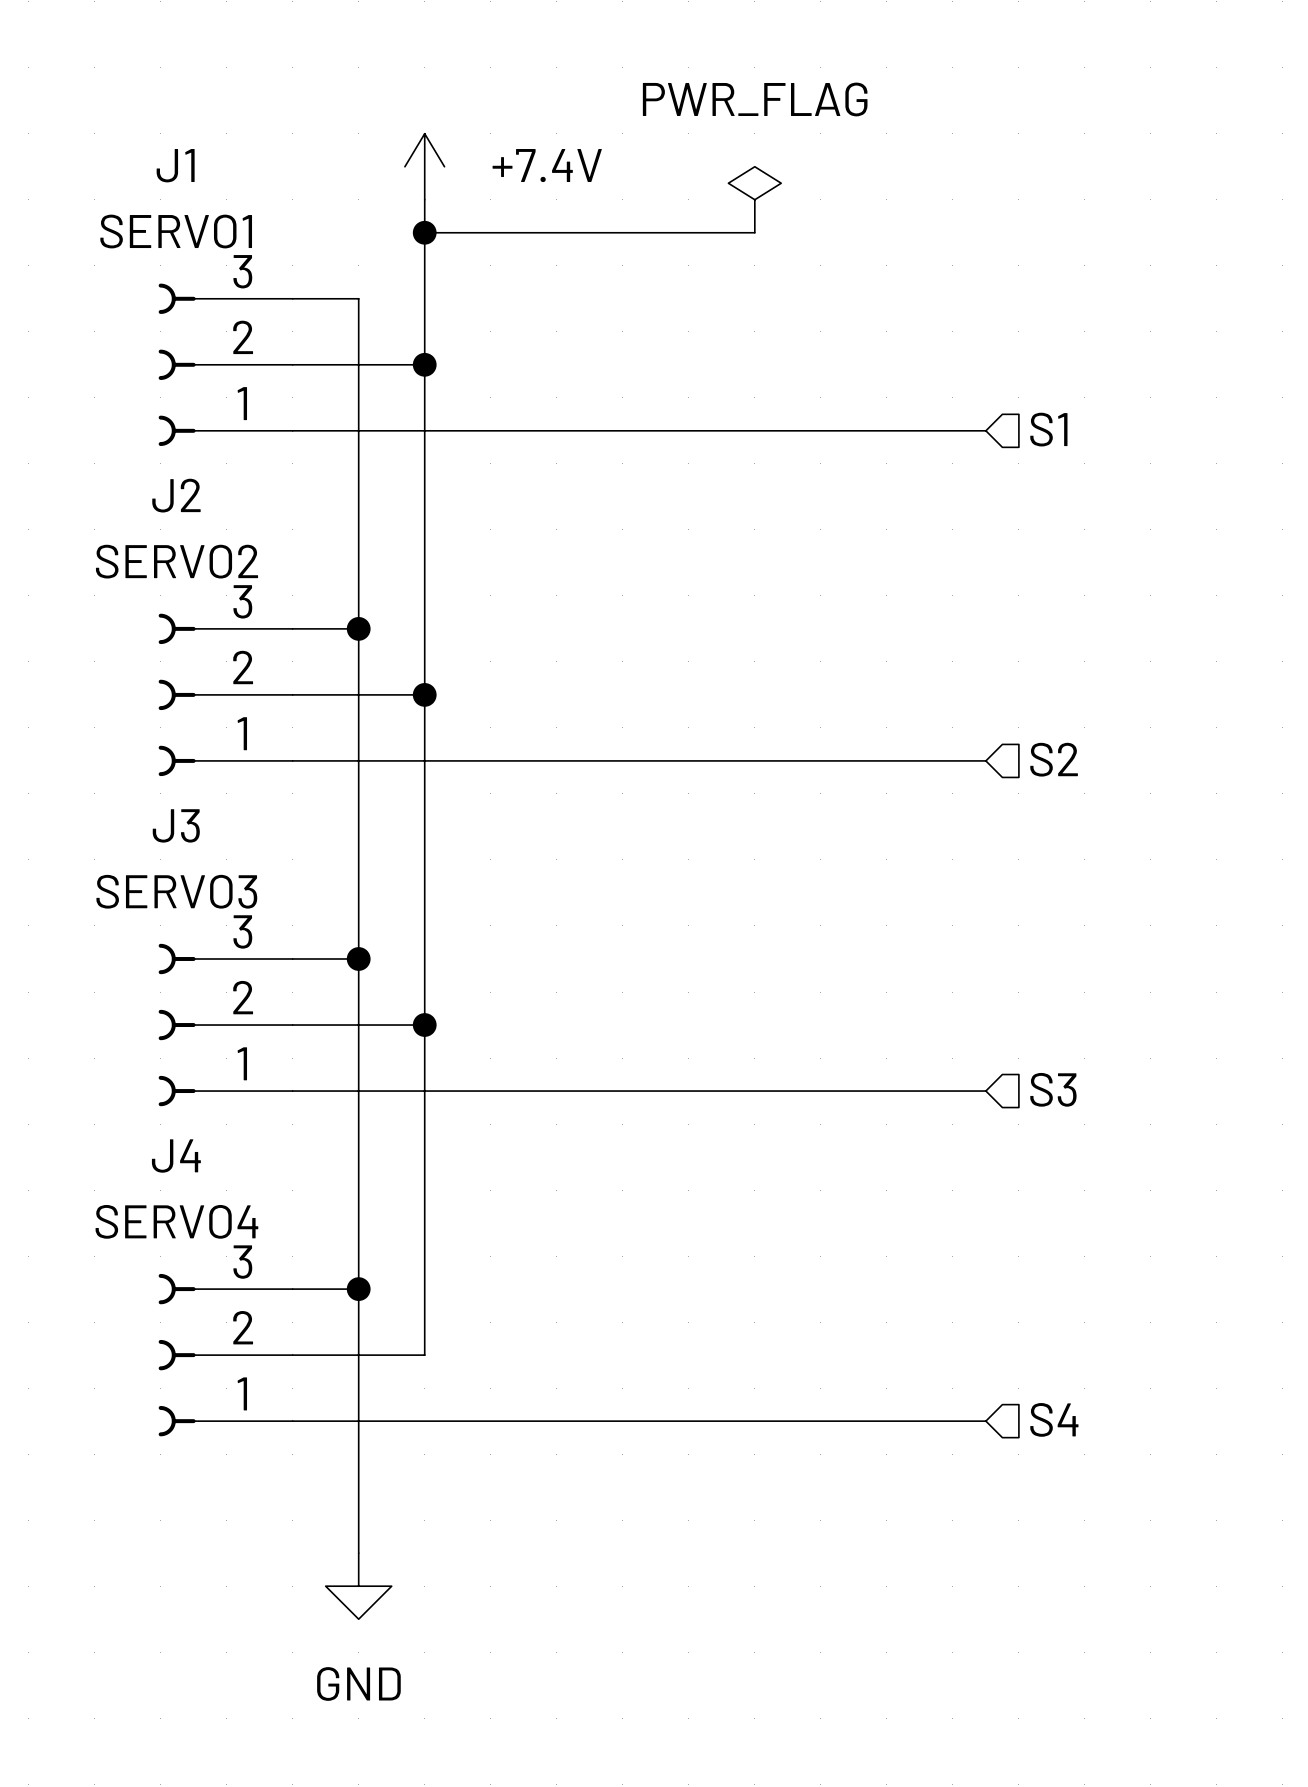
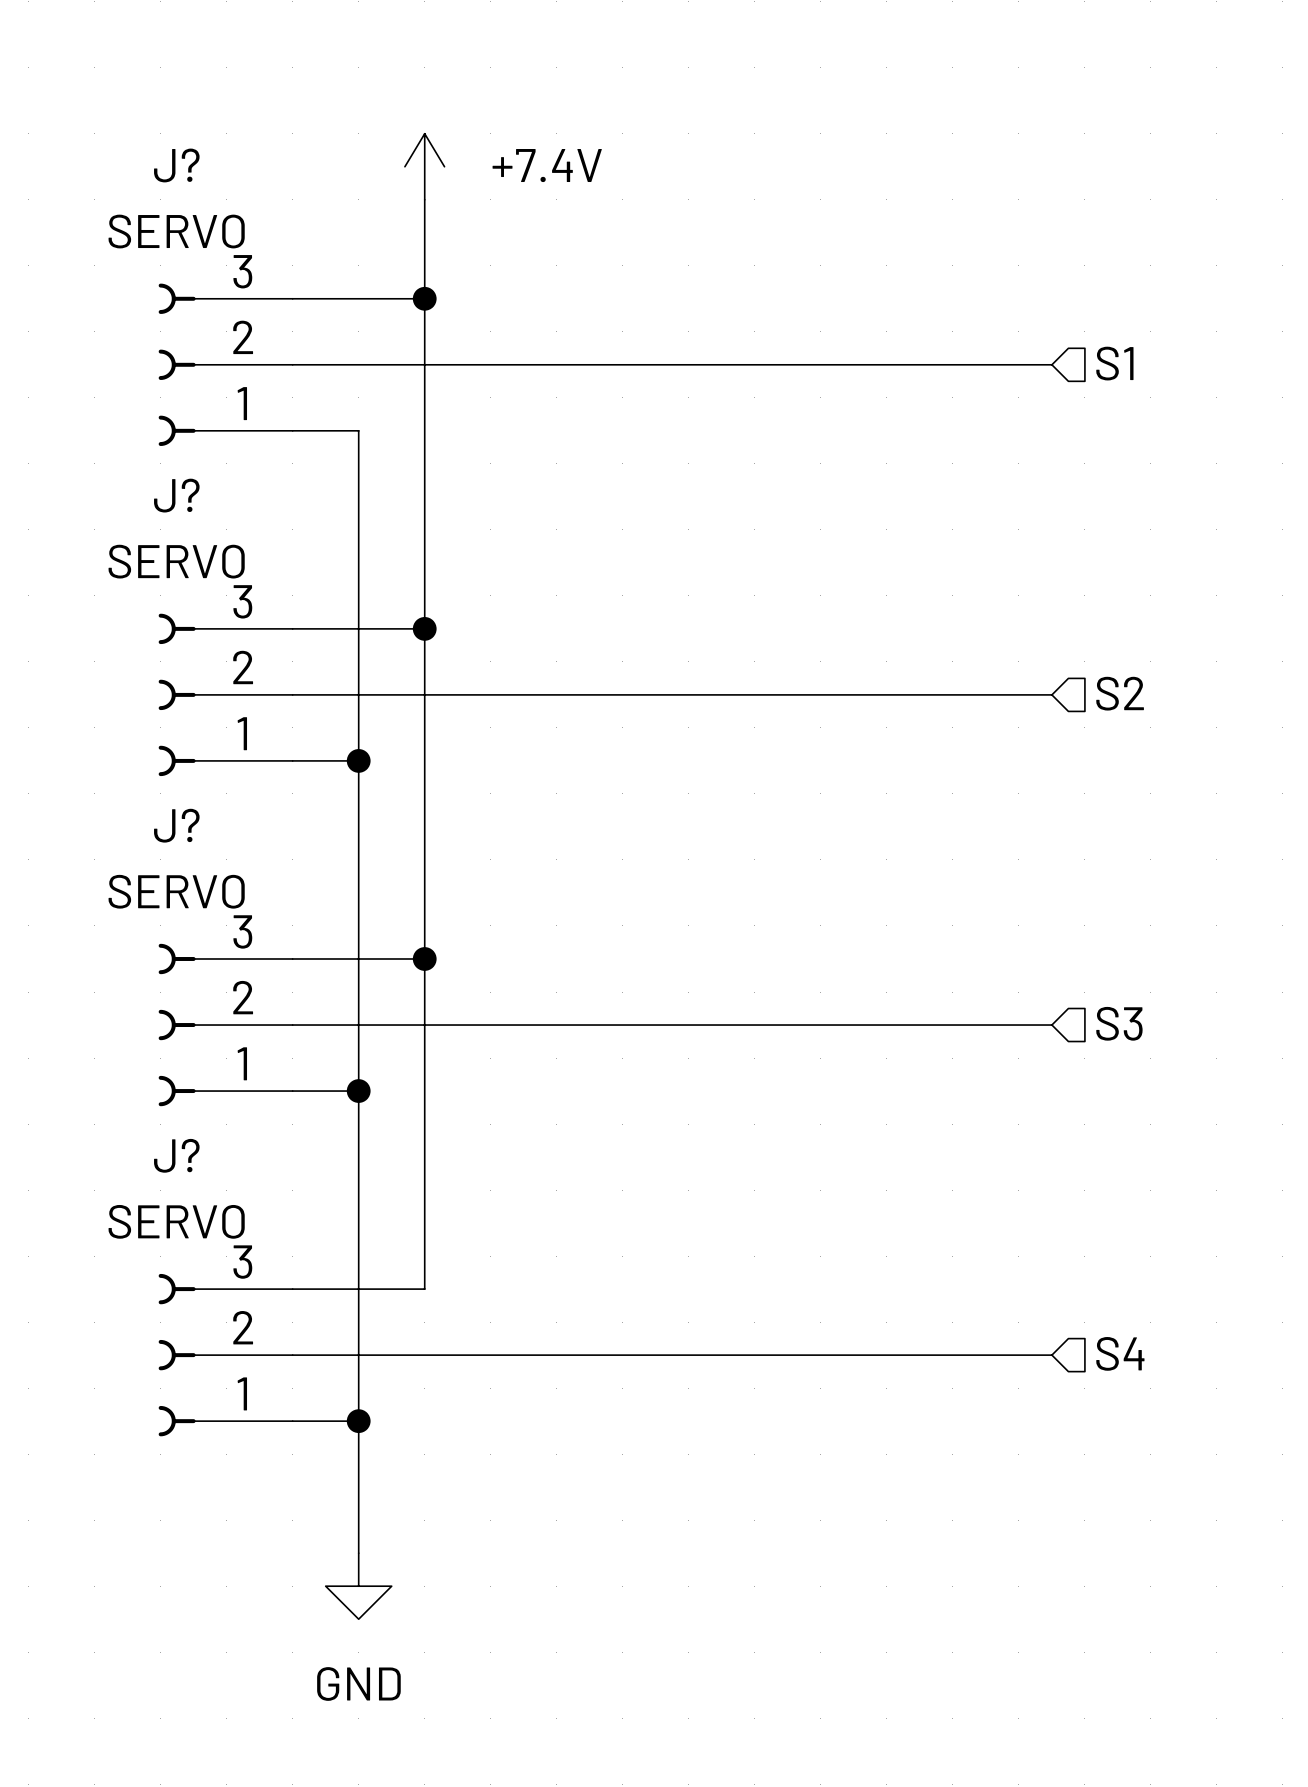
J1 name: J1 (175, 165) -> J? (176, 165)
power symbol: PWR_FLAG (754, 199) -> none
J1 value: SERVO1 (176, 231) -> SERVO (176, 231)
wire: (424, 232) (754, 232) -> none
junction: (424, 232) -> none
wire: (358, 298) (358, 430) (985, 430) -> (358, 298) (424, 298)
junction: none -> (424, 298)
wire: none -> (424, 364) (1051, 364)
junction: (424, 364) -> none
hierarchical label position: S1 (1048, 429) -> S1 (1114, 363)
J2 name: J2 (176, 495) -> J? (176, 495)
J2 value: SERVO2 (177, 561) -> SERVO (176, 561)
wire: none -> (358, 628) (424, 628)
junction: (358, 628) -> none
junction: none -> (424, 628)
junction: (424, 694) -> none
hierarchical label position: S2 (1054, 759) -> S2 (1120, 693)
wire: (358, 760) (985, 760) -> (424, 694) (1051, 694)
junction: none -> (358, 760)
J3 name: J3 (176, 825) -> J? (176, 825)
J3 value: SERVO3 (176, 891) -> SERVO (176, 891)
wire: none -> (358, 958) (424, 958)
junction: (358, 958) -> none
junction: none -> (424, 958)
junction: (424, 1025) -> none
hierarchical label position: S3 (1053, 1089) -> S3 (1119, 1023)
wire: (358, 1091) (985, 1091) -> (424, 1025) (1051, 1025)
junction: none -> (358, 1091)
J4 name: J4 (176, 1156) -> J? (176, 1155)
J4 value: SERVO4 (176, 1221) -> SERVO (176, 1221)
junction: (358, 1289) -> none
wire: (424, 1289) (424, 1355) -> (424, 1289) (358, 1289)
hierarchical label position: S4 (1054, 1419) -> S4 (1120, 1353)
wire: (358, 1421) (985, 1421) -> (424, 1355) (1051, 1355)
junction: none -> (358, 1421)

